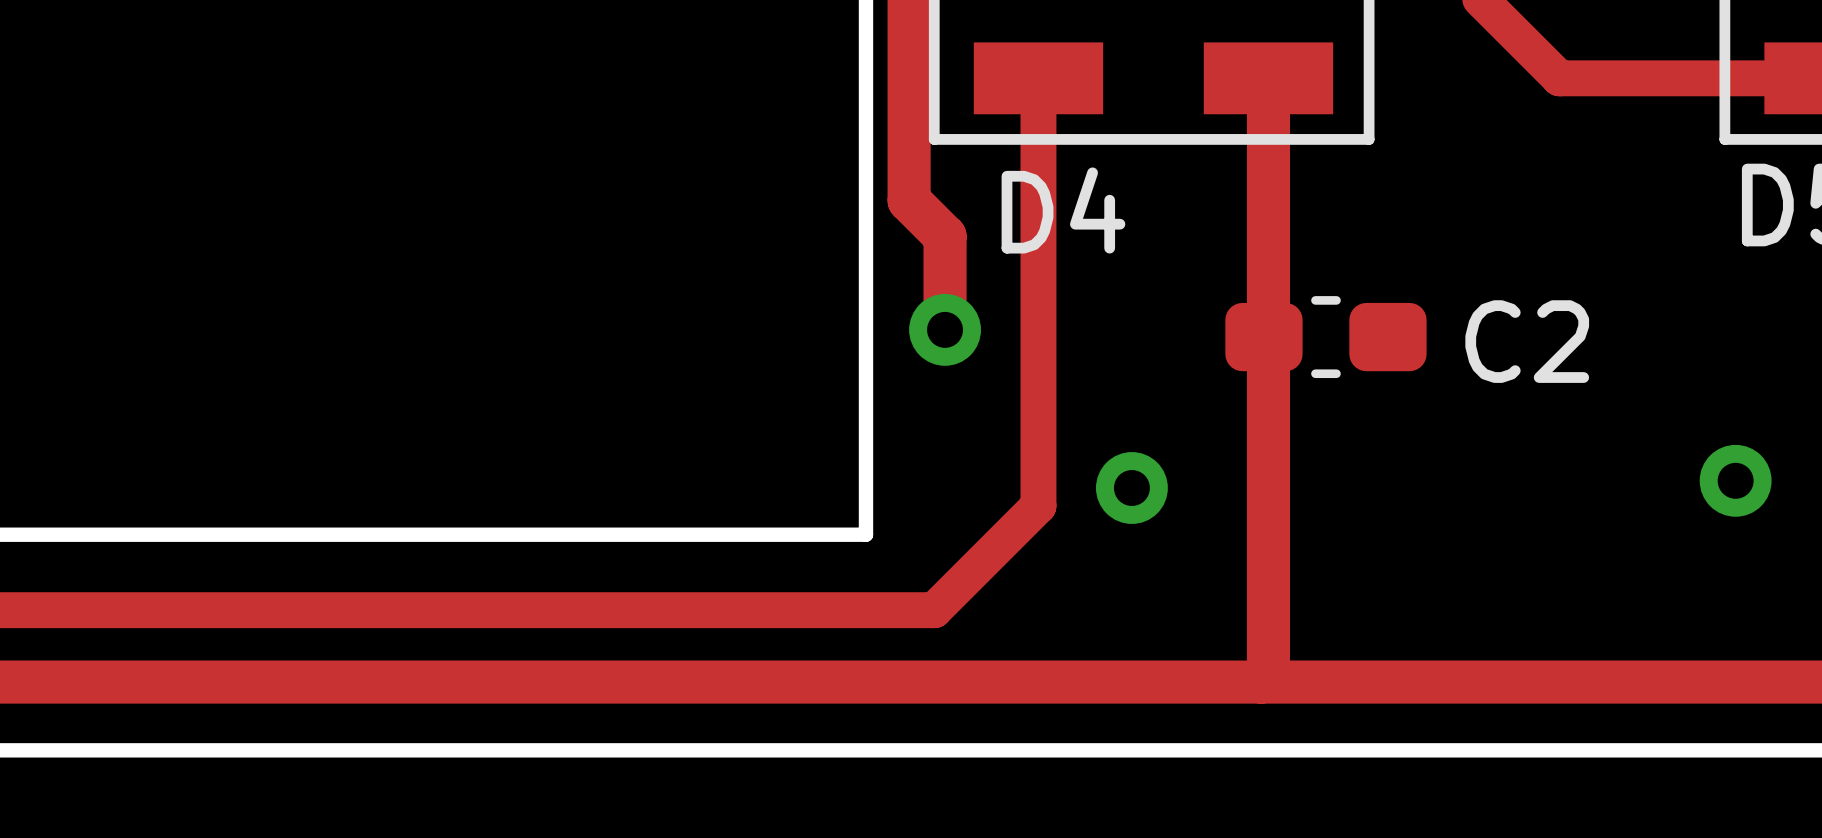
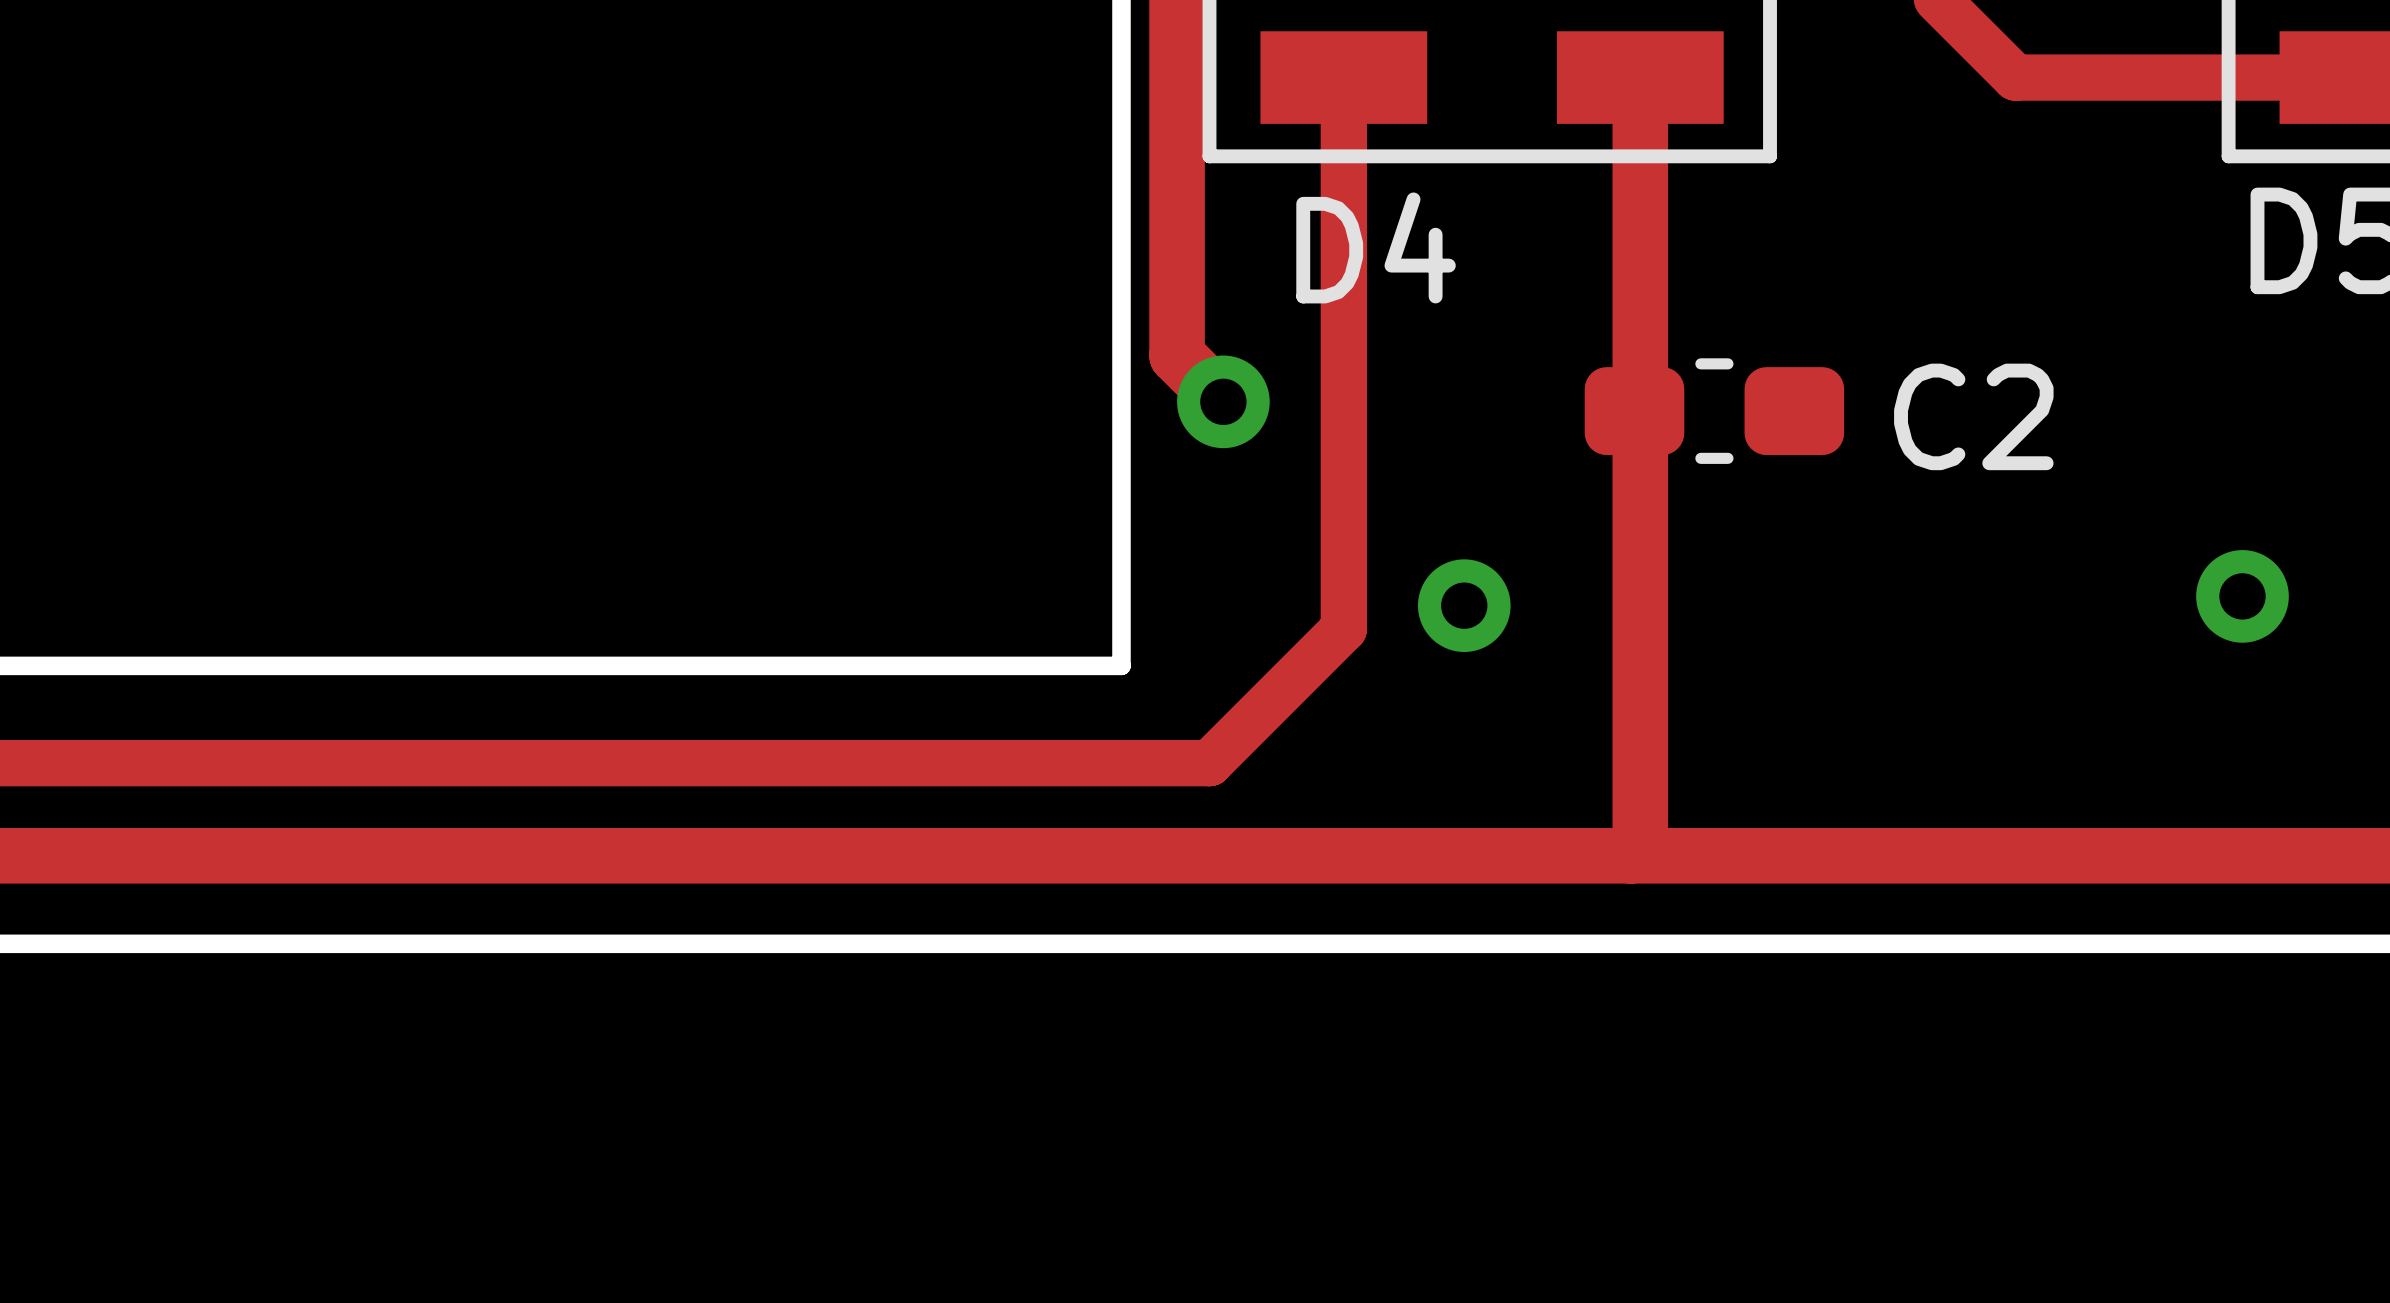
track: (909, 200) (945, 236) (945, 329) -> (1177, 235) (1177, 355) (1223, 401)

